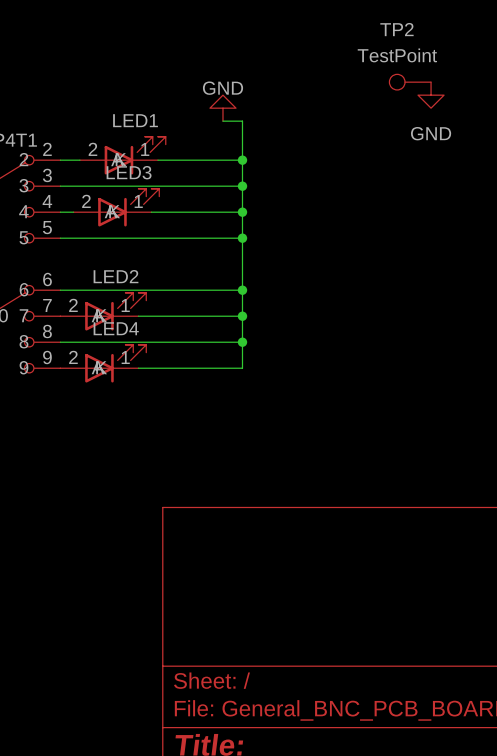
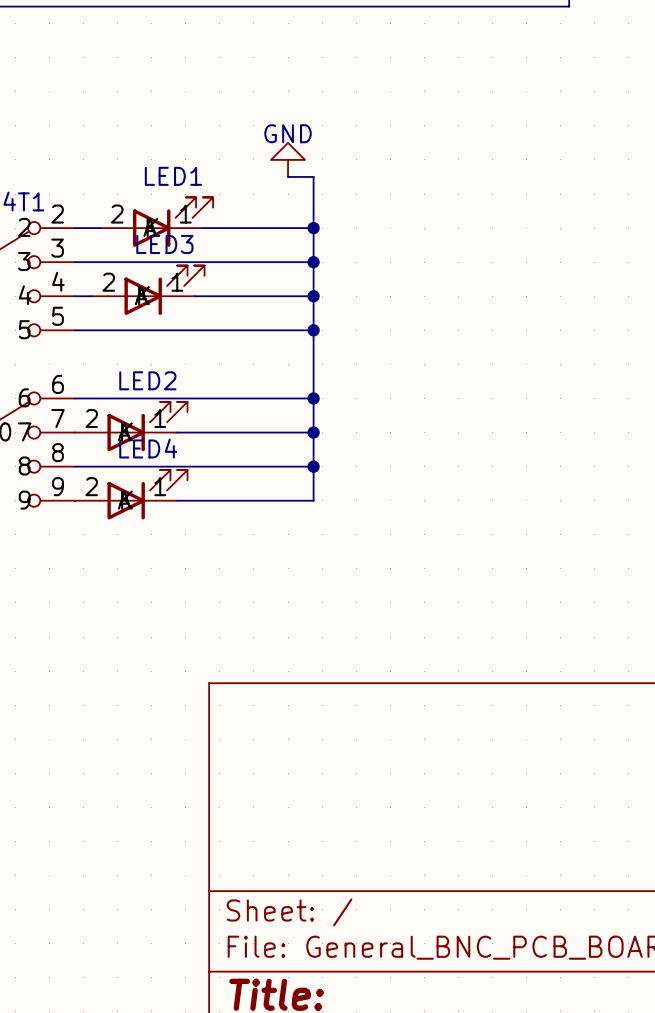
TP2: TestPoint (410, 82) -> none
power symbol: GND (431, 95) -> none

